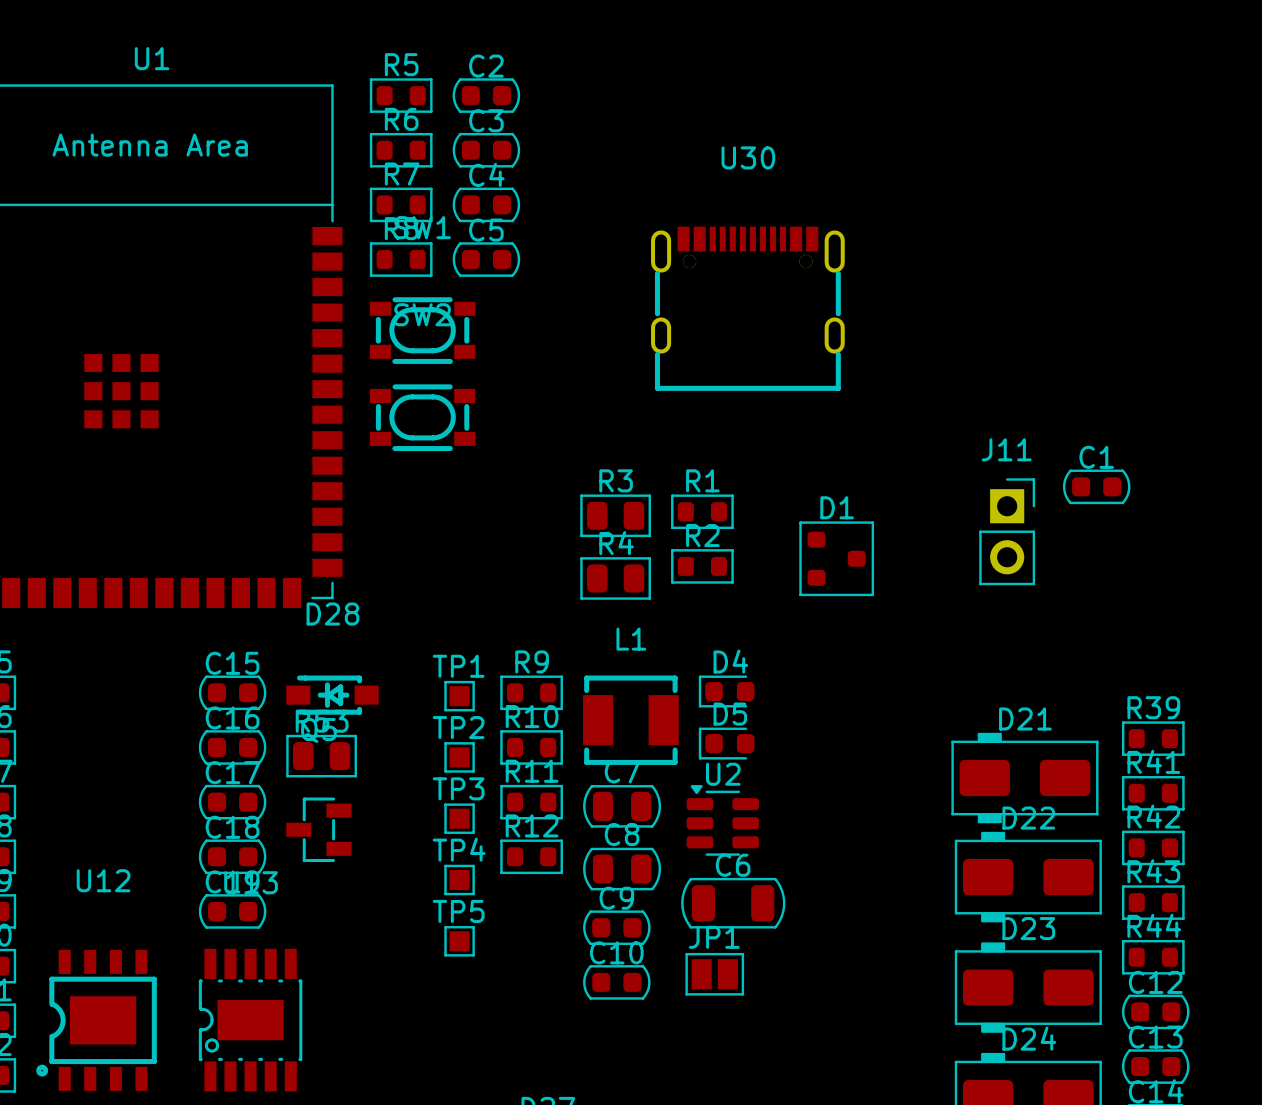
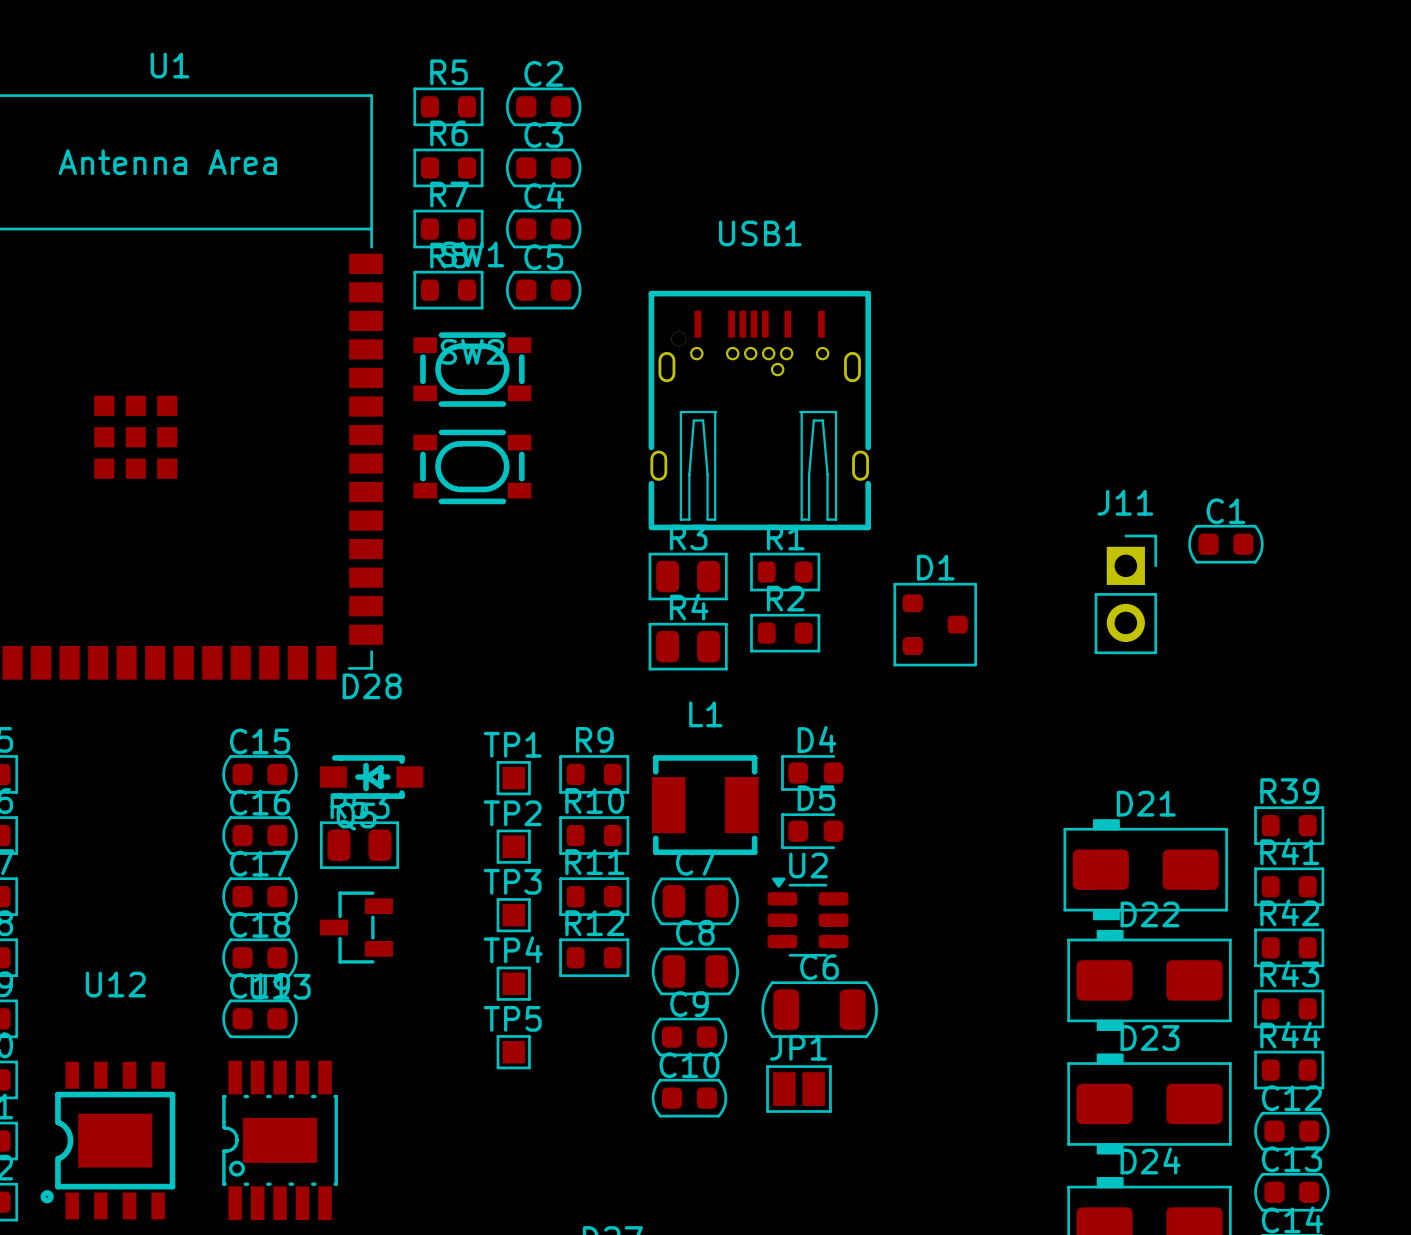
U30: (747, 308) -> none
USB1: none -> (759, 410)

